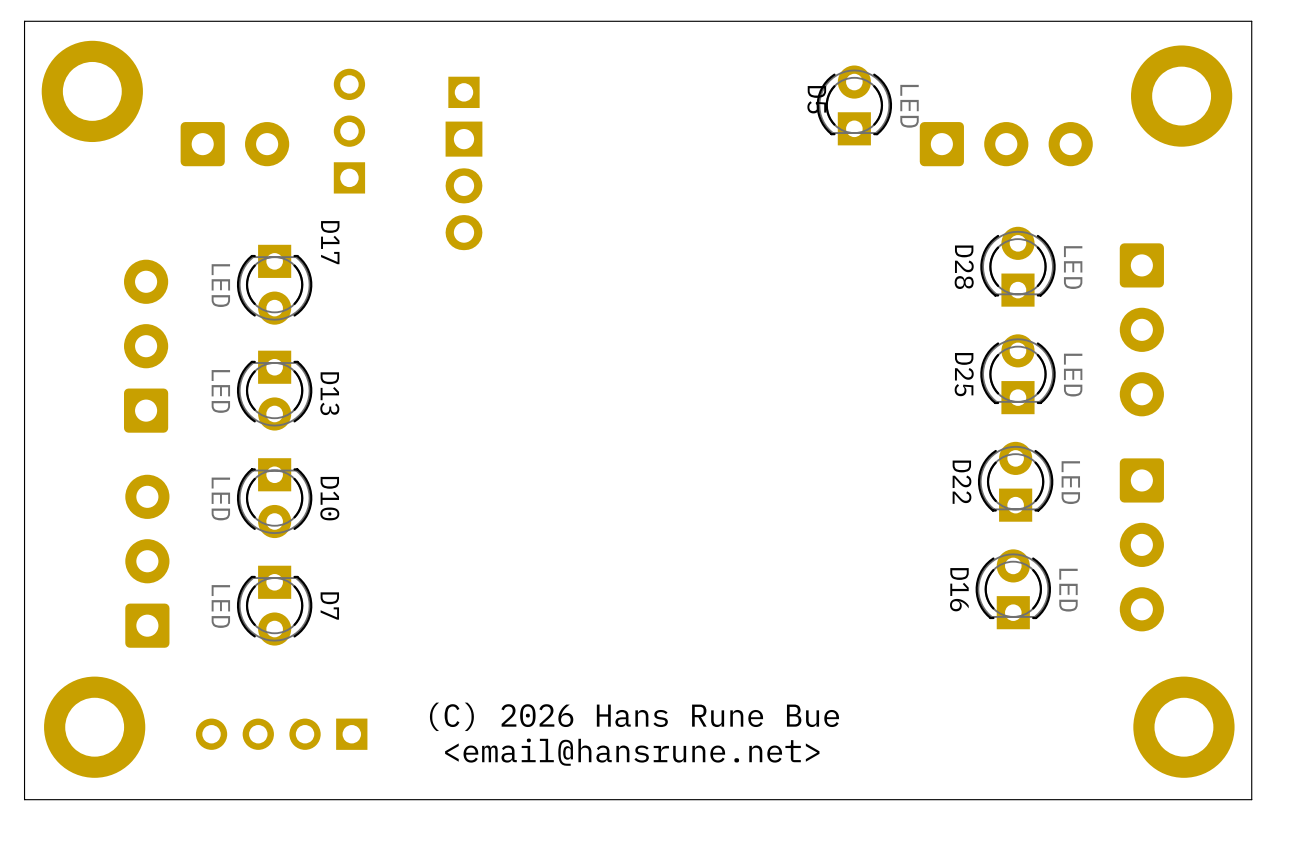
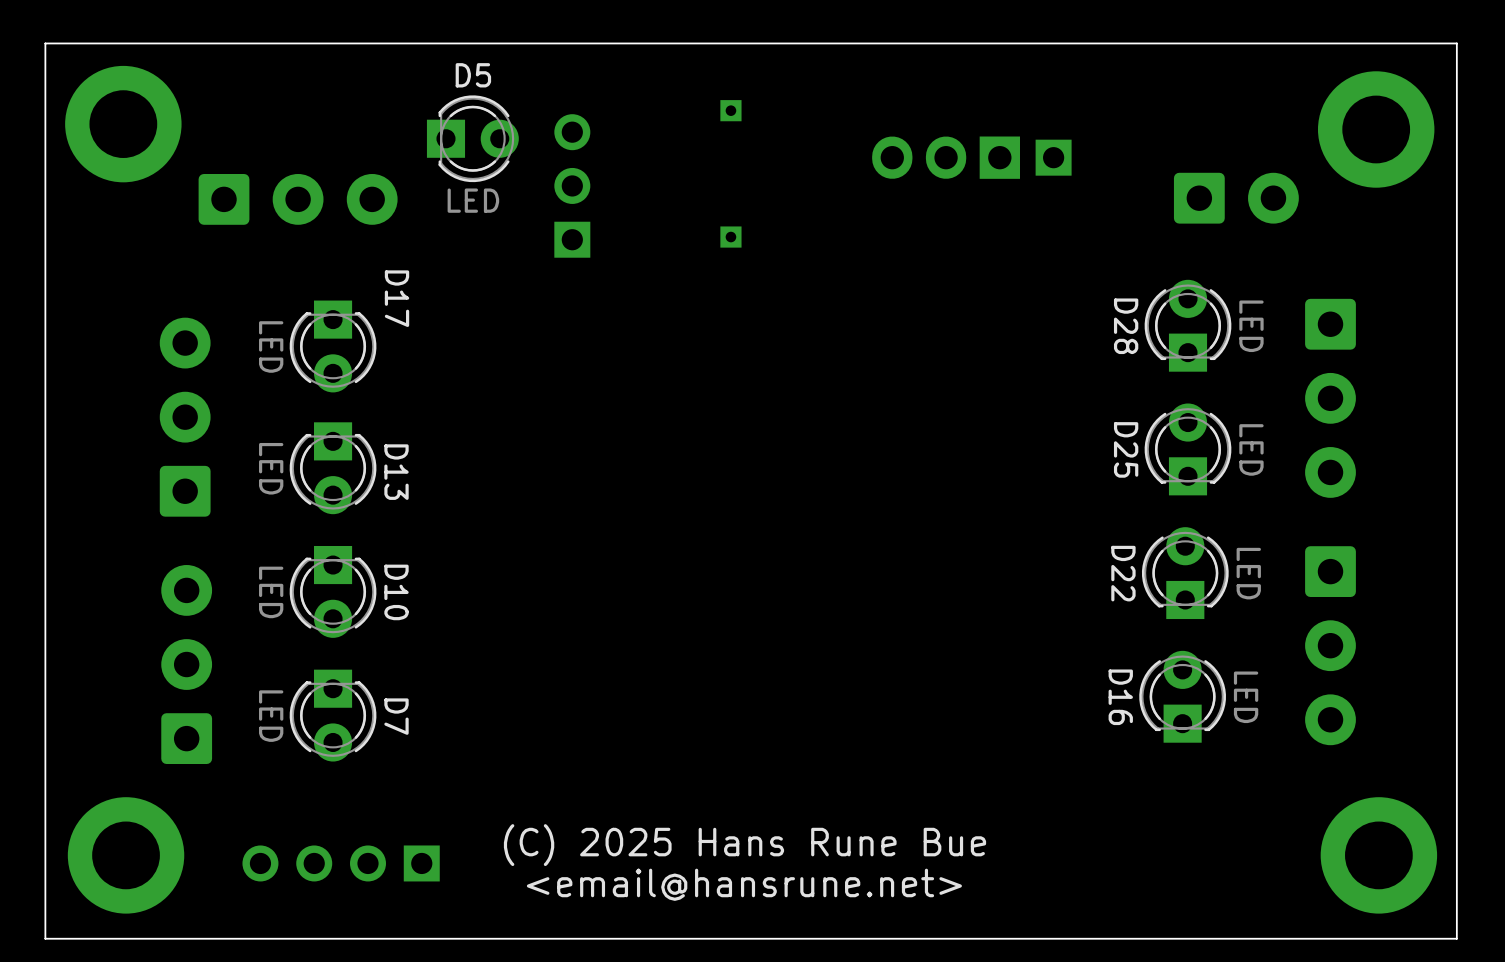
part: none -> (730, 110)
part position: (463, 92) -> (1053, 157)
D5 rotation: 0° (854, 105) -> 90° clockwise (472, 138)
D5 position: (854, 105) -> (472, 138)
part footprint: [180, 122, 290, 167] -> [198, 173, 398, 225]
part position: (349, 131) -> (572, 185)
part: (1006, 144) -> none
part: none -> (1236, 198)
part rotation: 0° (463, 185) -> 90° clockwise (946, 157)
part position: (463, 185) -> (946, 157)
part: none -> (730, 237)
text: (C) 2026 Hans Rune Bue (634, 716) -> (C) 2025 Hans Rune Bue (745, 845)

